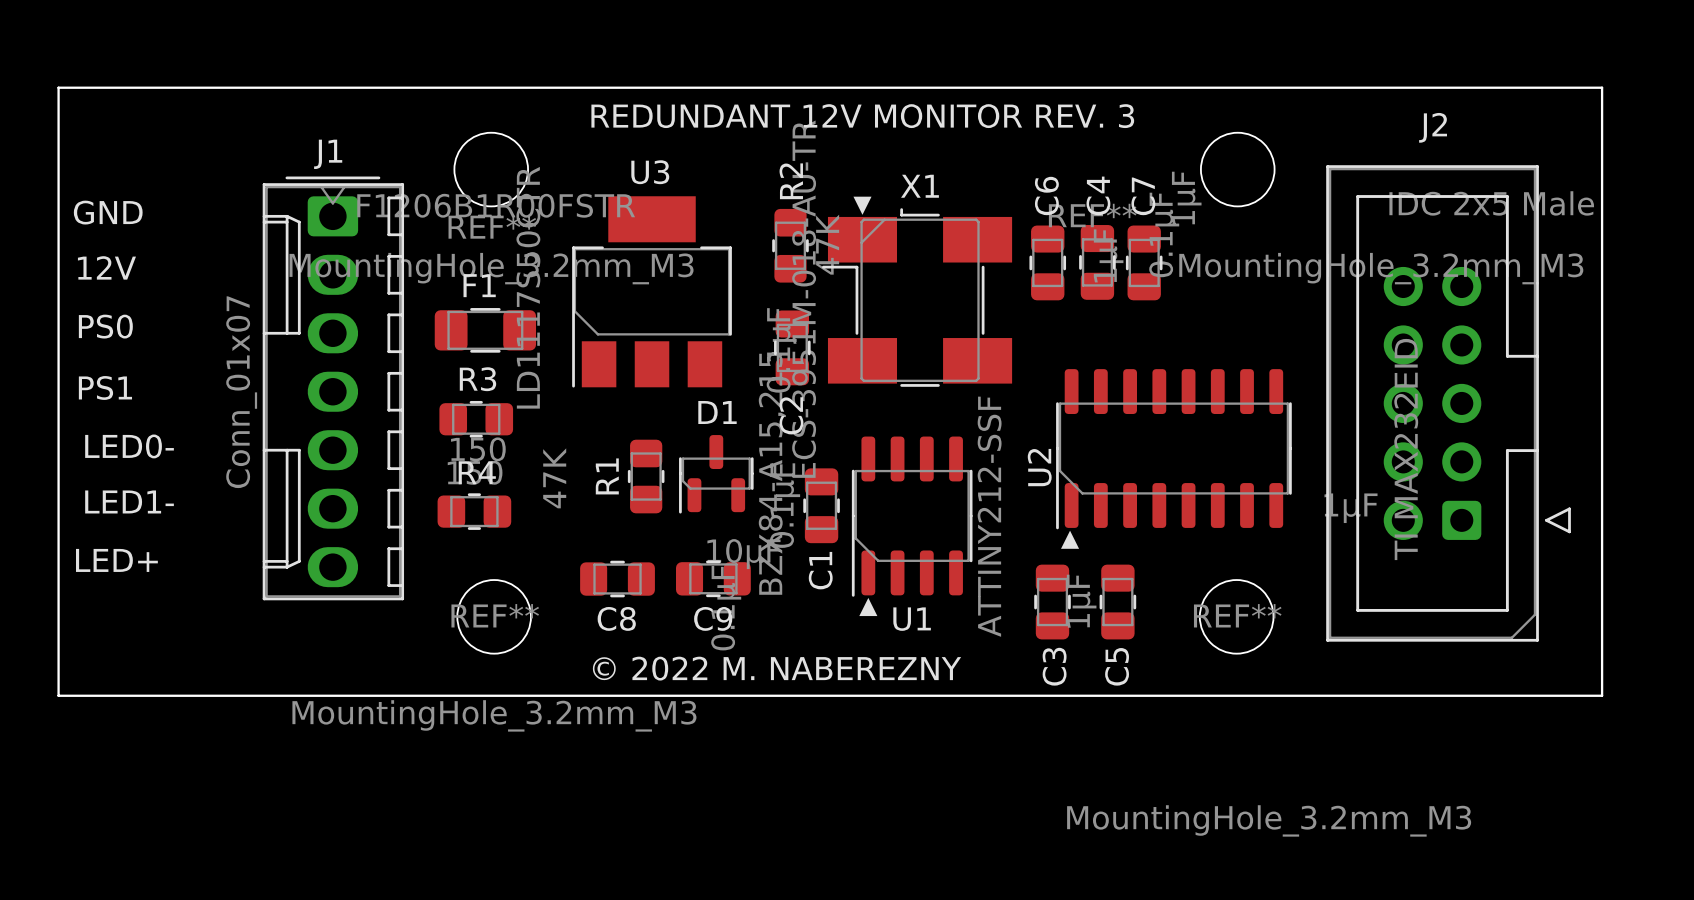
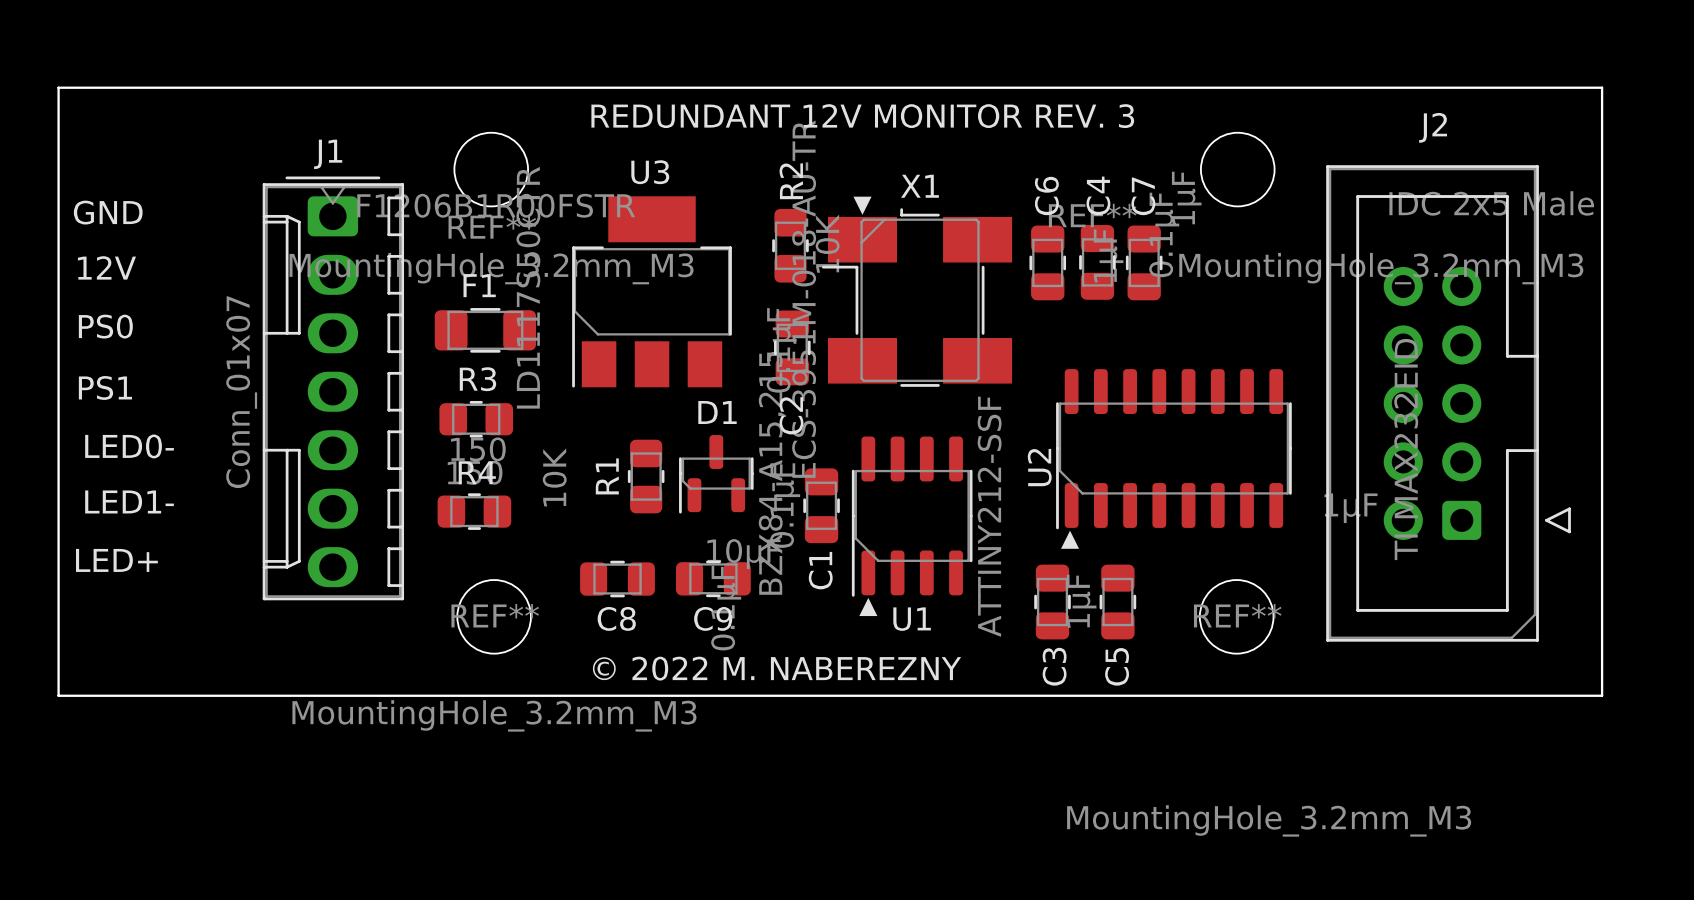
R2 value: 47K (827, 244) -> 10K (827, 243)
R1 value: 47K (554, 478) -> 10K (554, 477)

